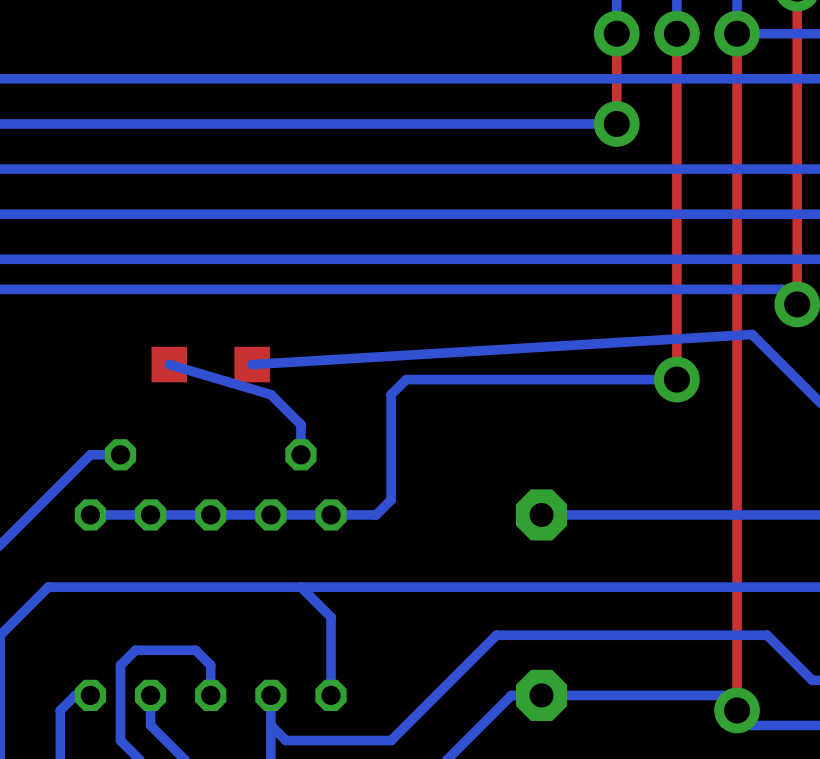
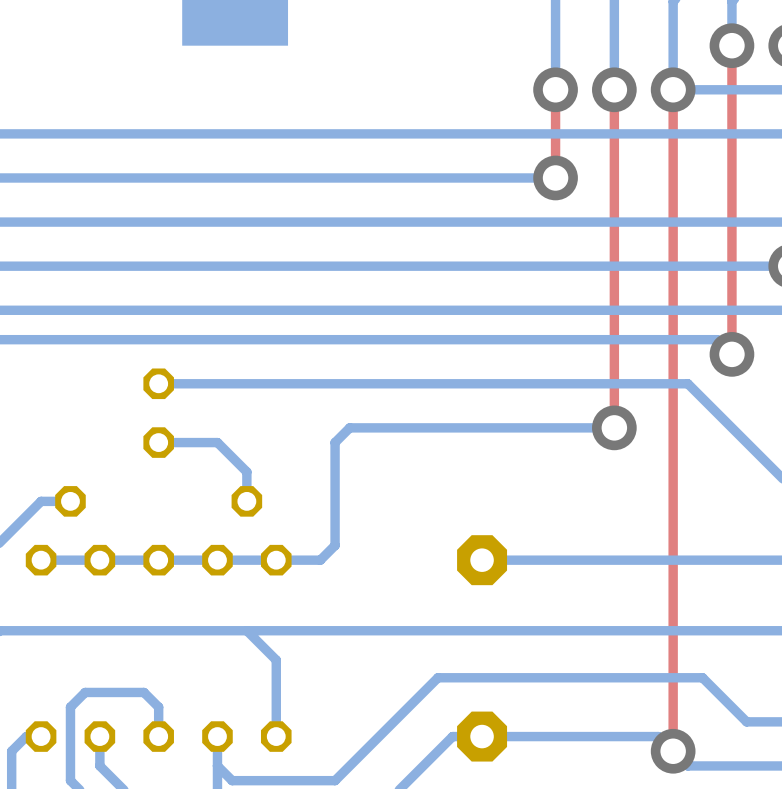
bottom track: (752, 334) (252, 364) -> (687, 383) (158, 383)
part footprint: [151, 346, 270, 383] -> [143, 368, 174, 458]
bottom track: (169, 364) (270, 394) -> (158, 442) (217, 442)

